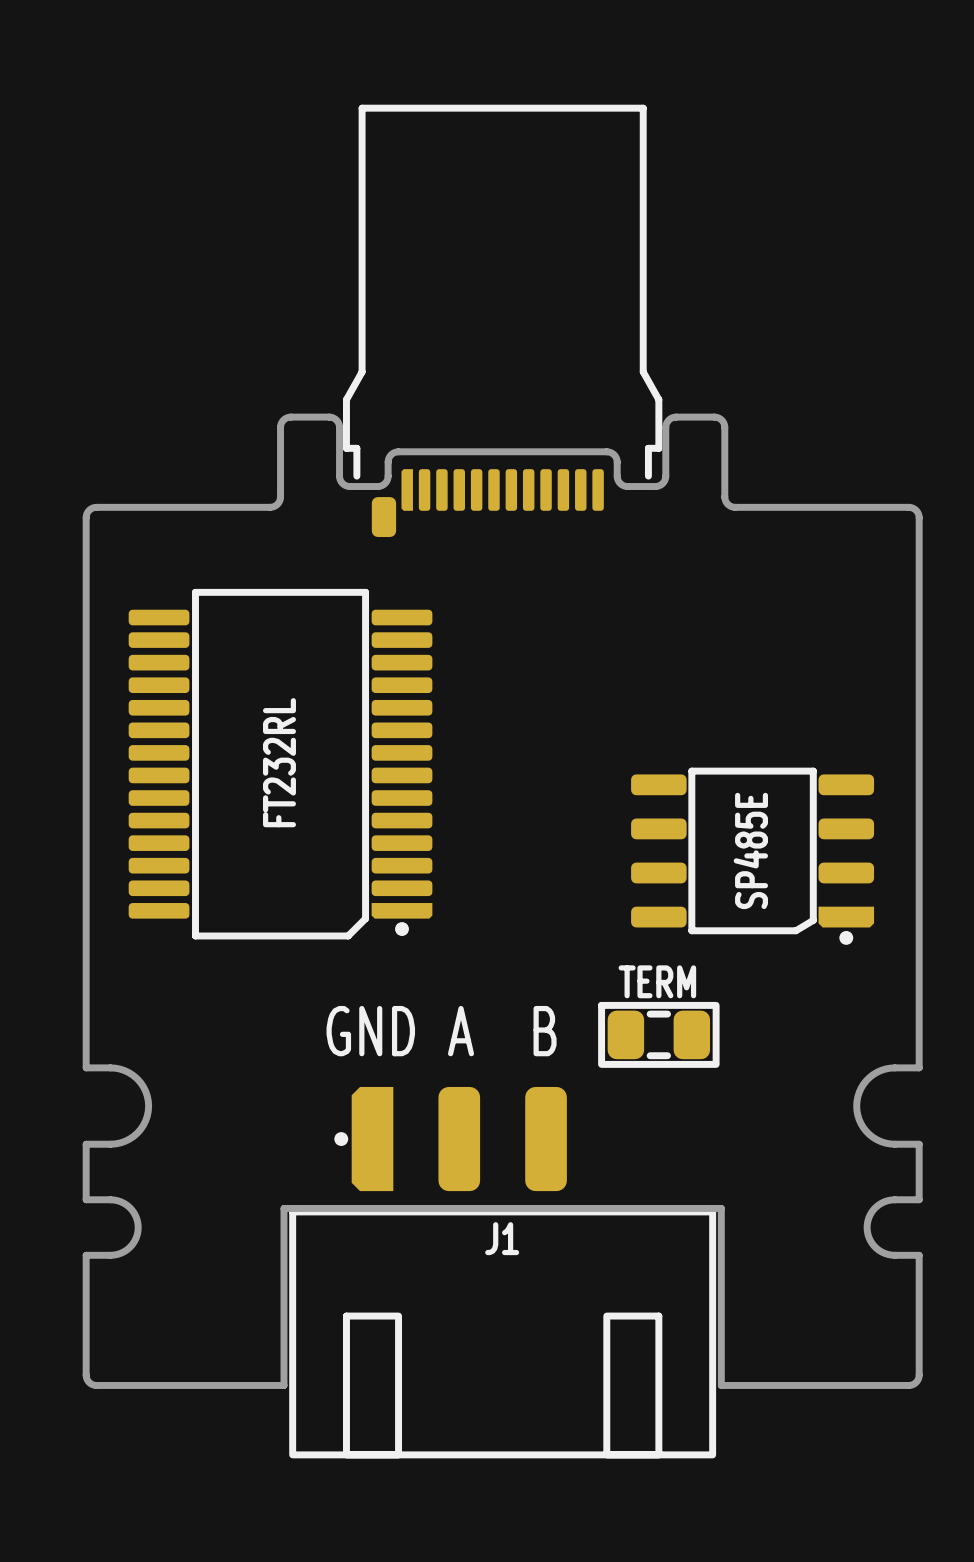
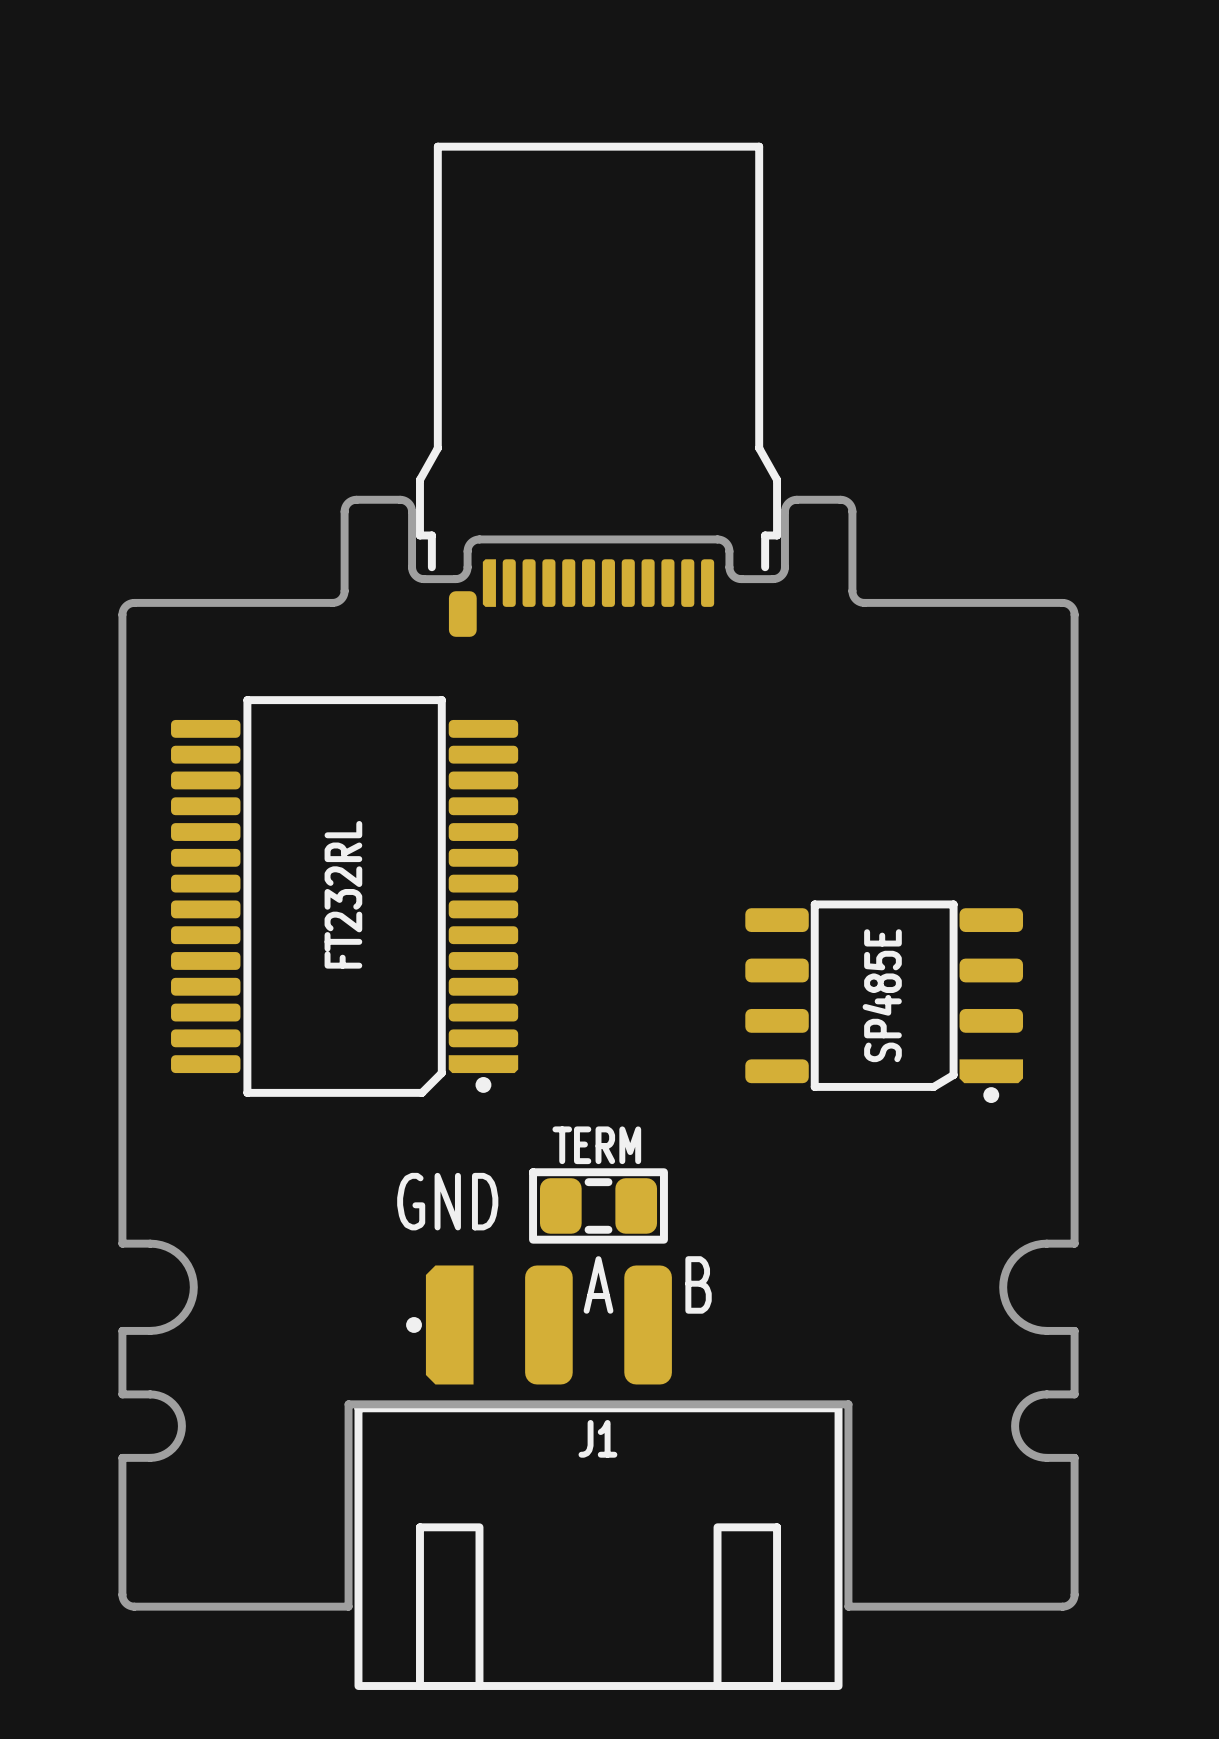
text position: A (461, 1031) -> A (598, 1284)
text position: B (545, 1031) -> B (698, 1284)
part position: (658, 1034) -> (598, 1205)

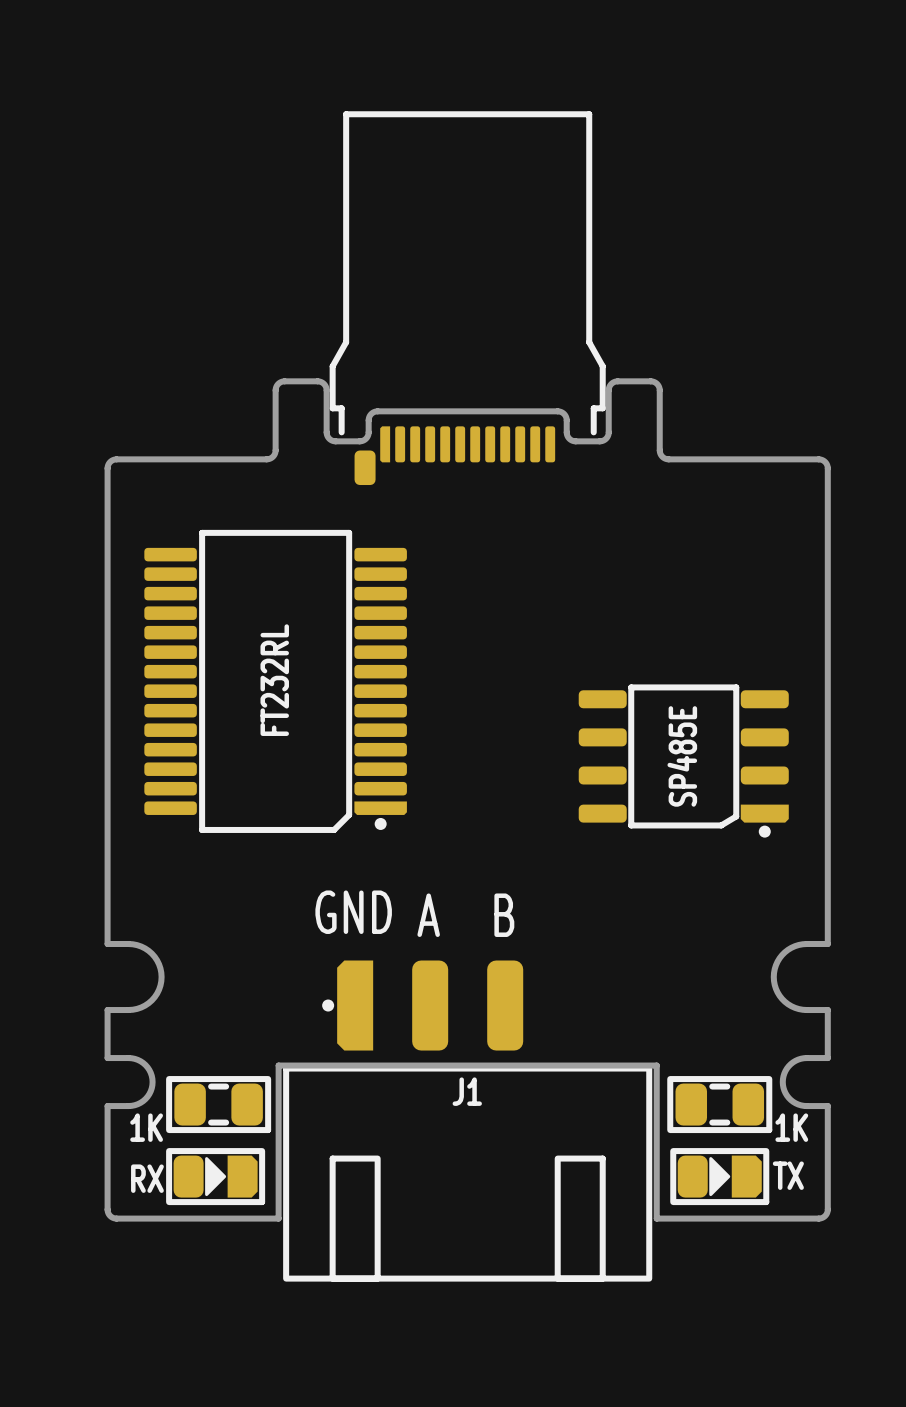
part: TERM (598, 1205) -> none
text position: A (598, 1284) -> A (428, 915)
text position: B (698, 1284) -> B (504, 915)
part: none -> 1K (218, 1104)
part: none -> 1K (719, 1104)
part: none -> RX (215, 1176)
part: none -> TX (719, 1176)

